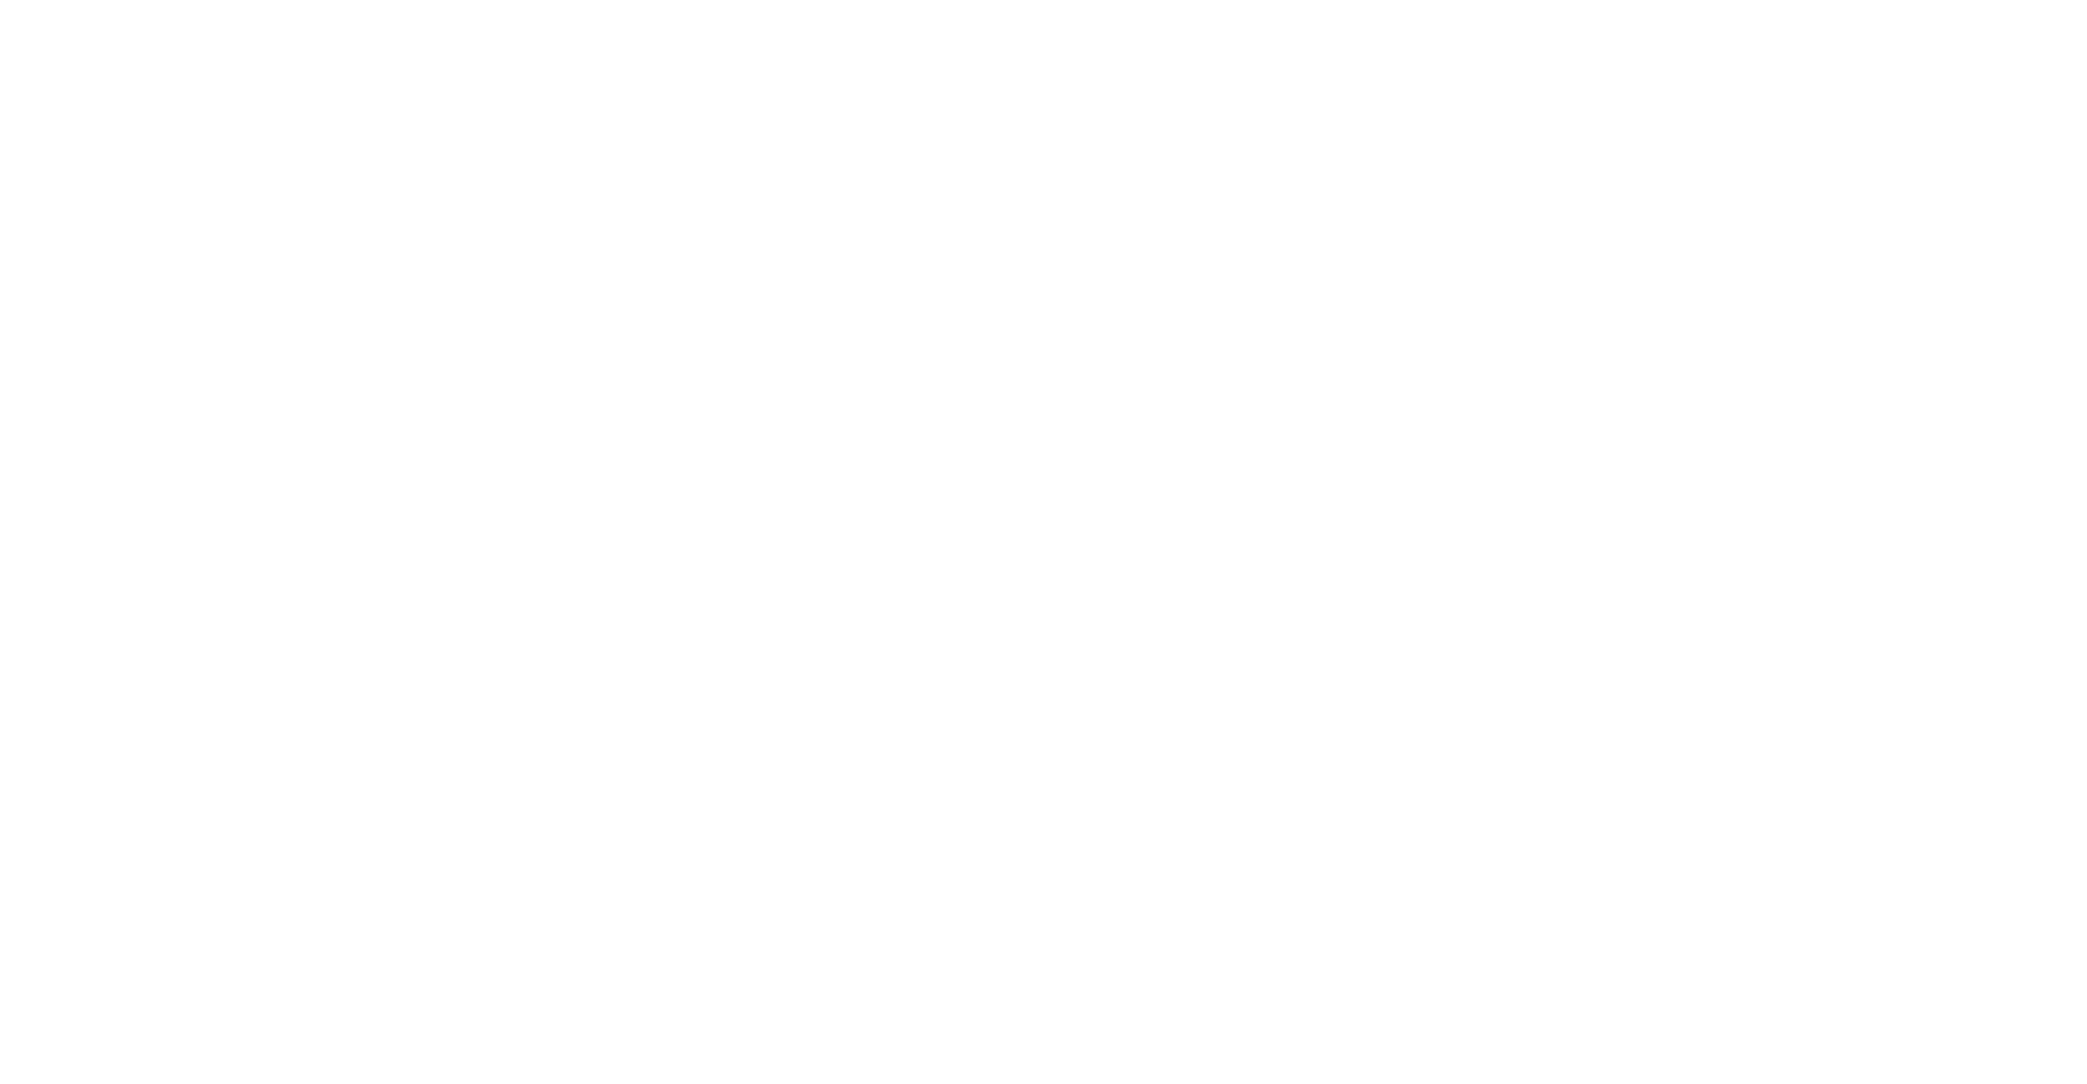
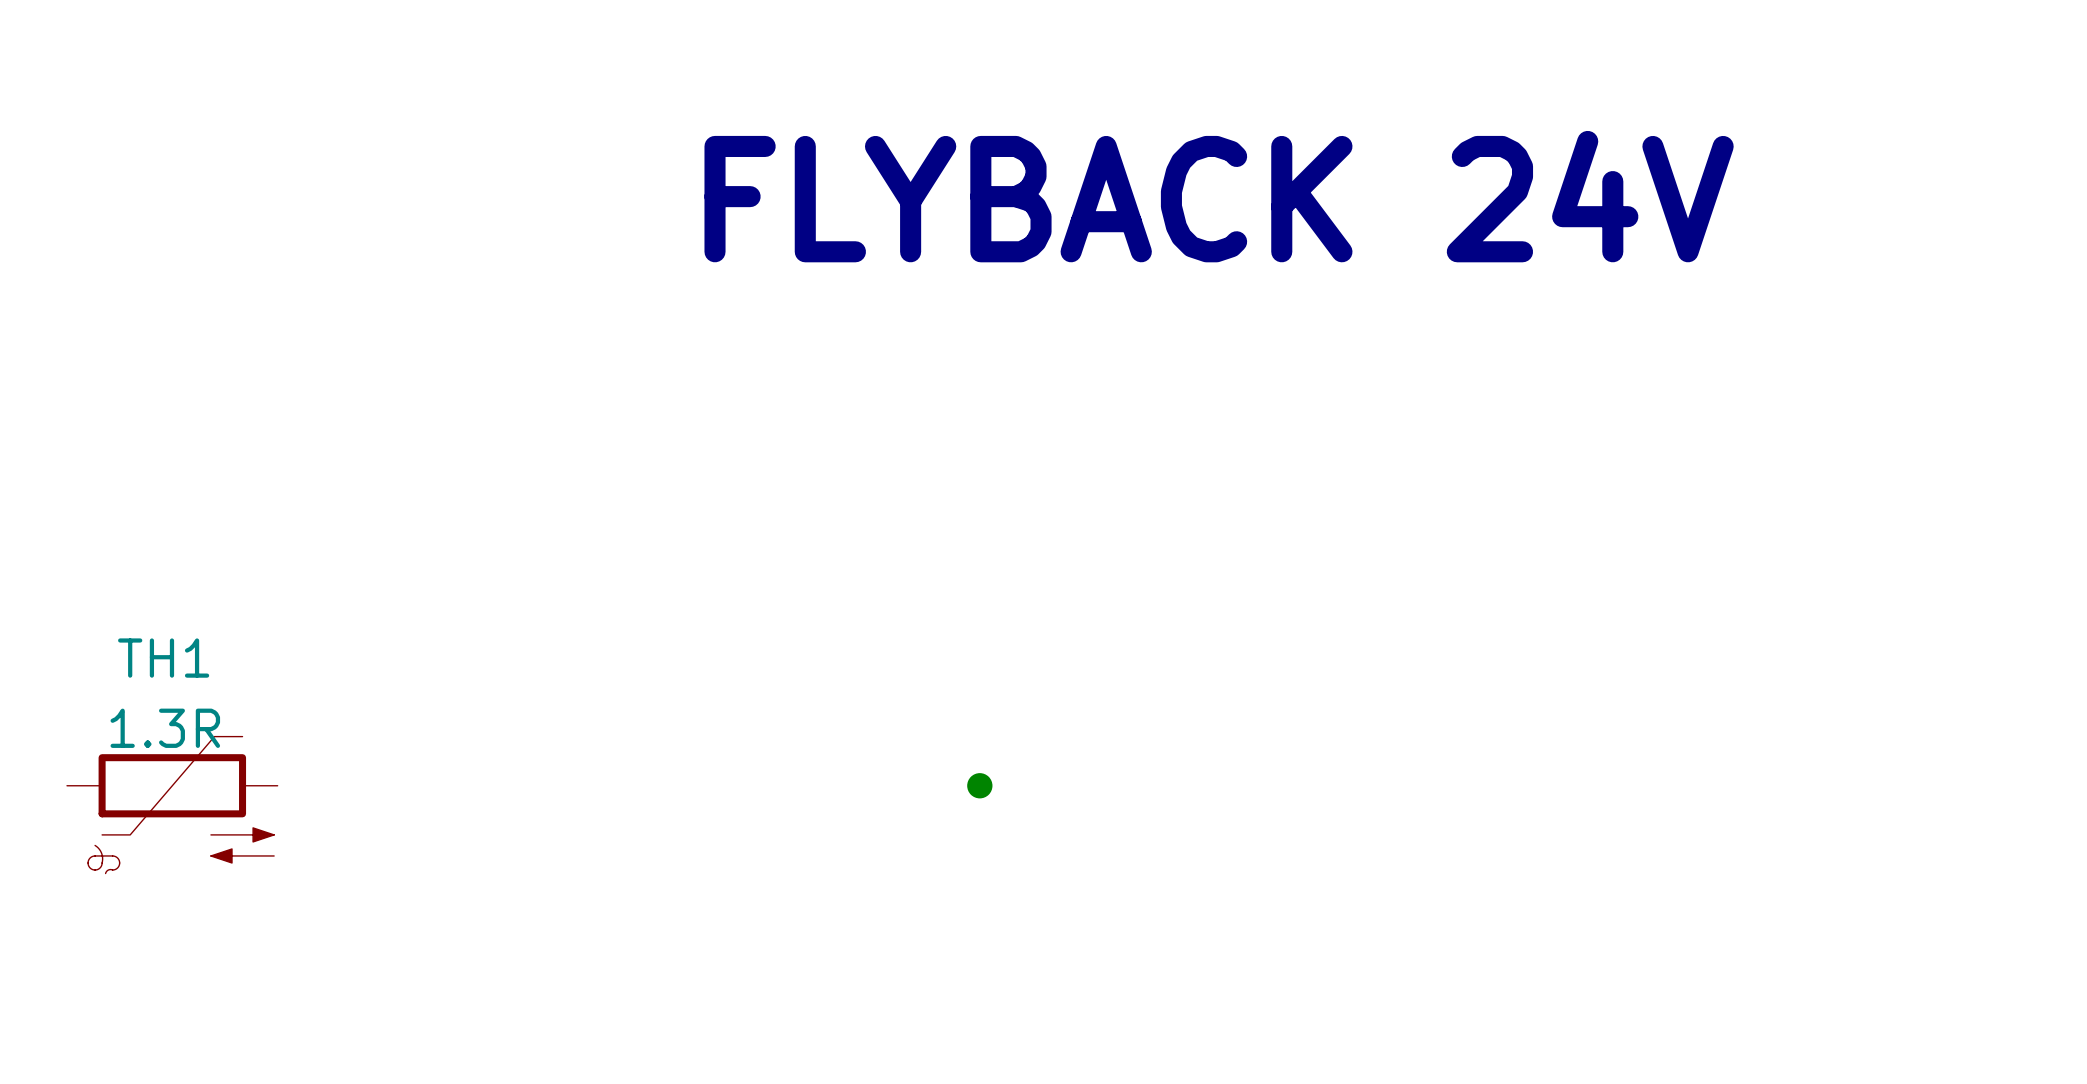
text: none -> FLYBACK 24V (1219, 196)
junction: none -> (979, 785)
TH1: none -> 1.3R (172, 805)

